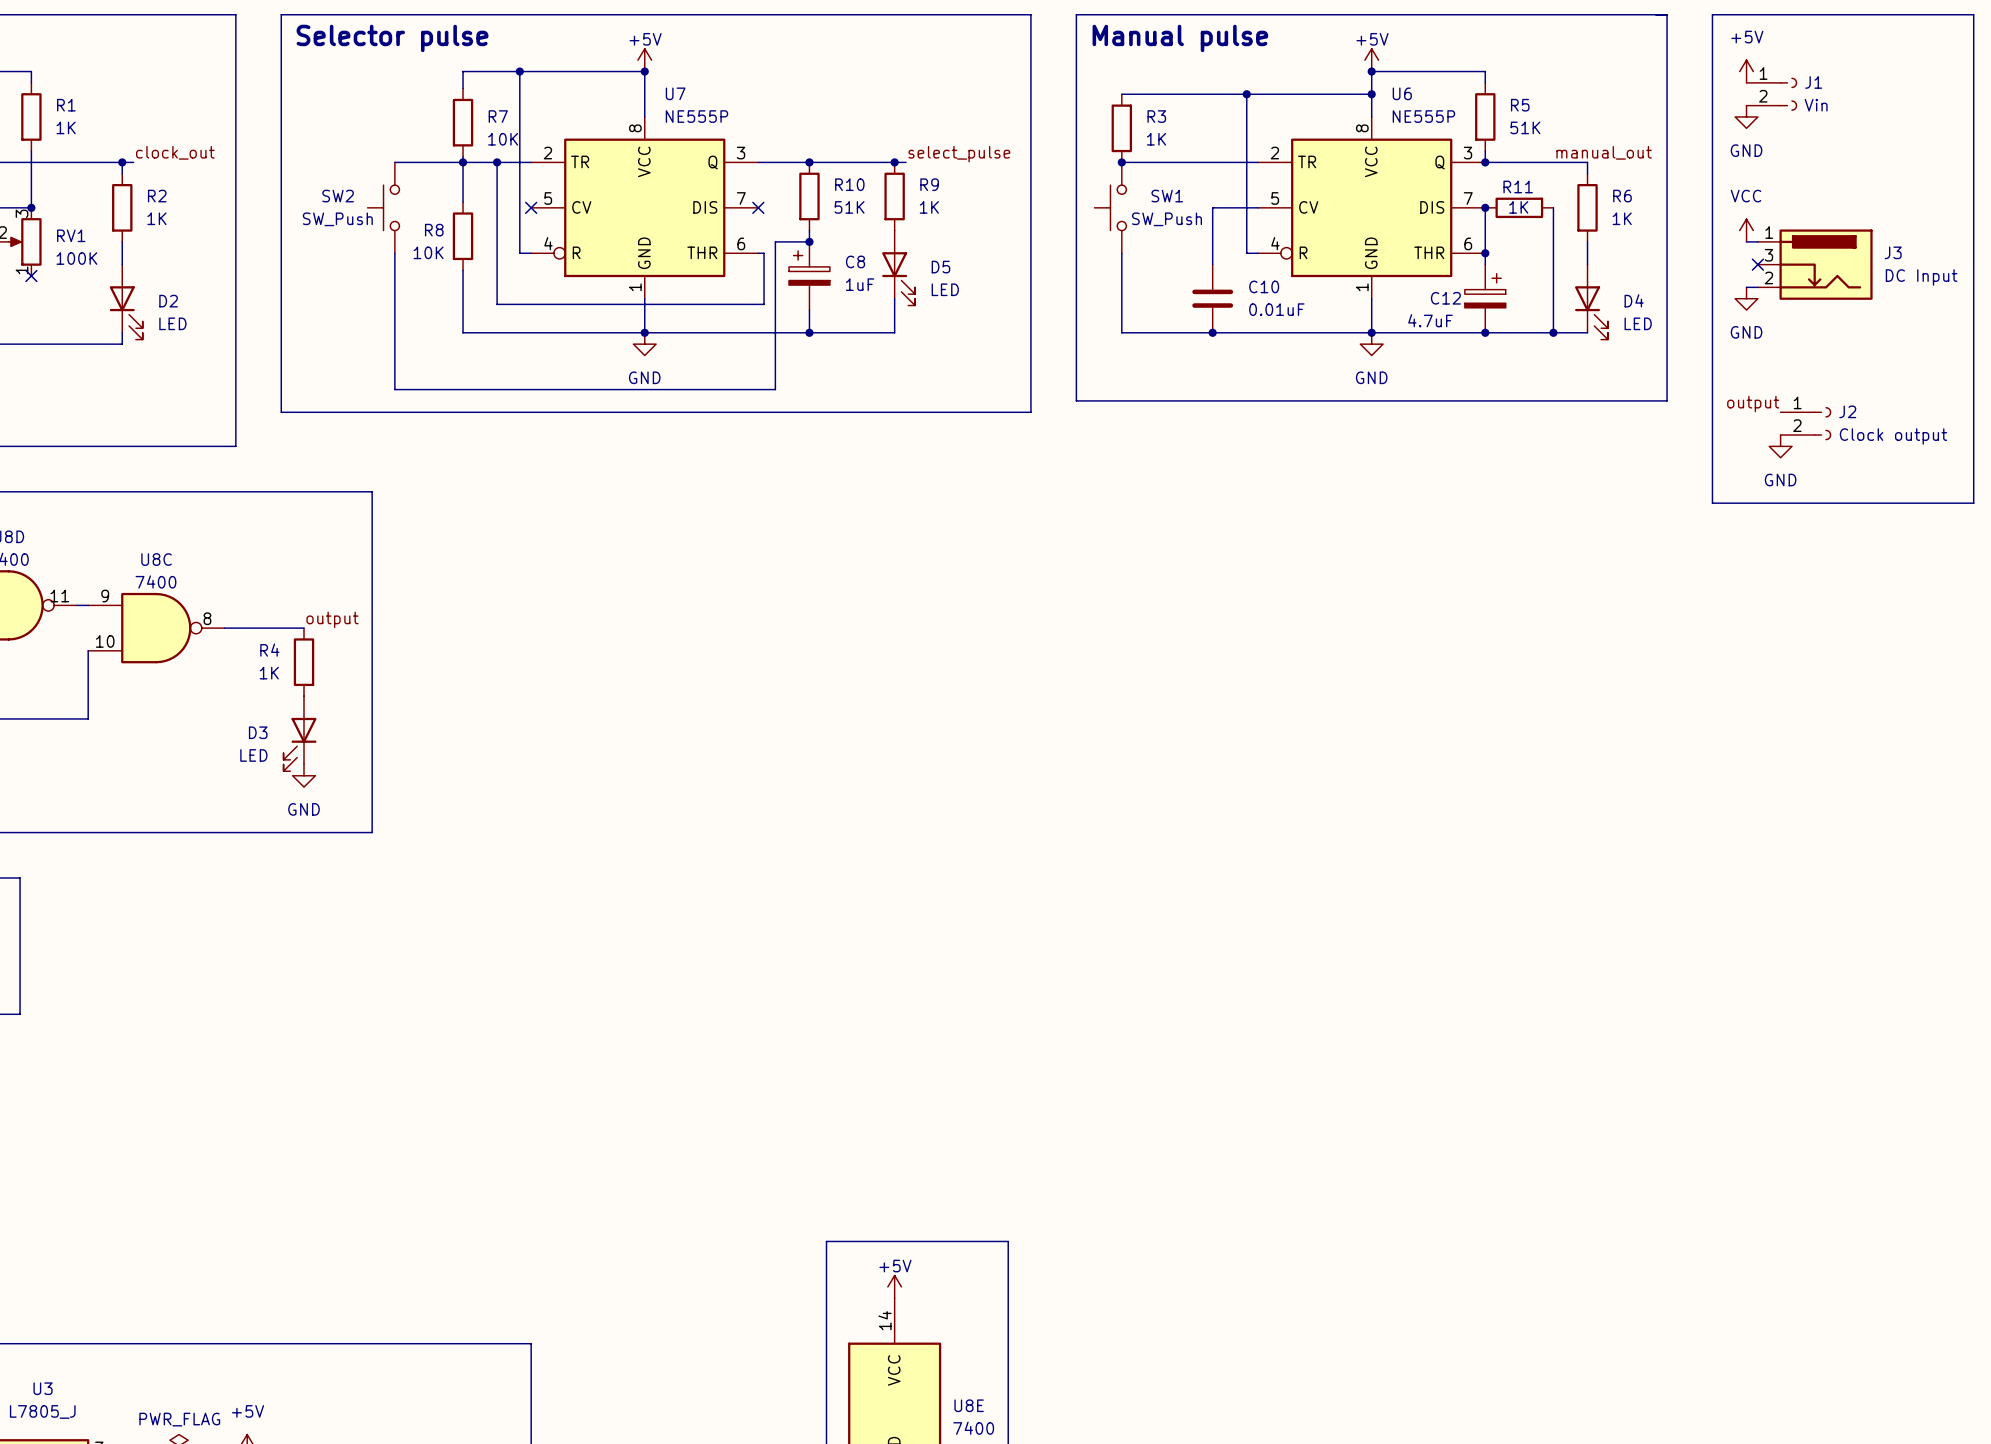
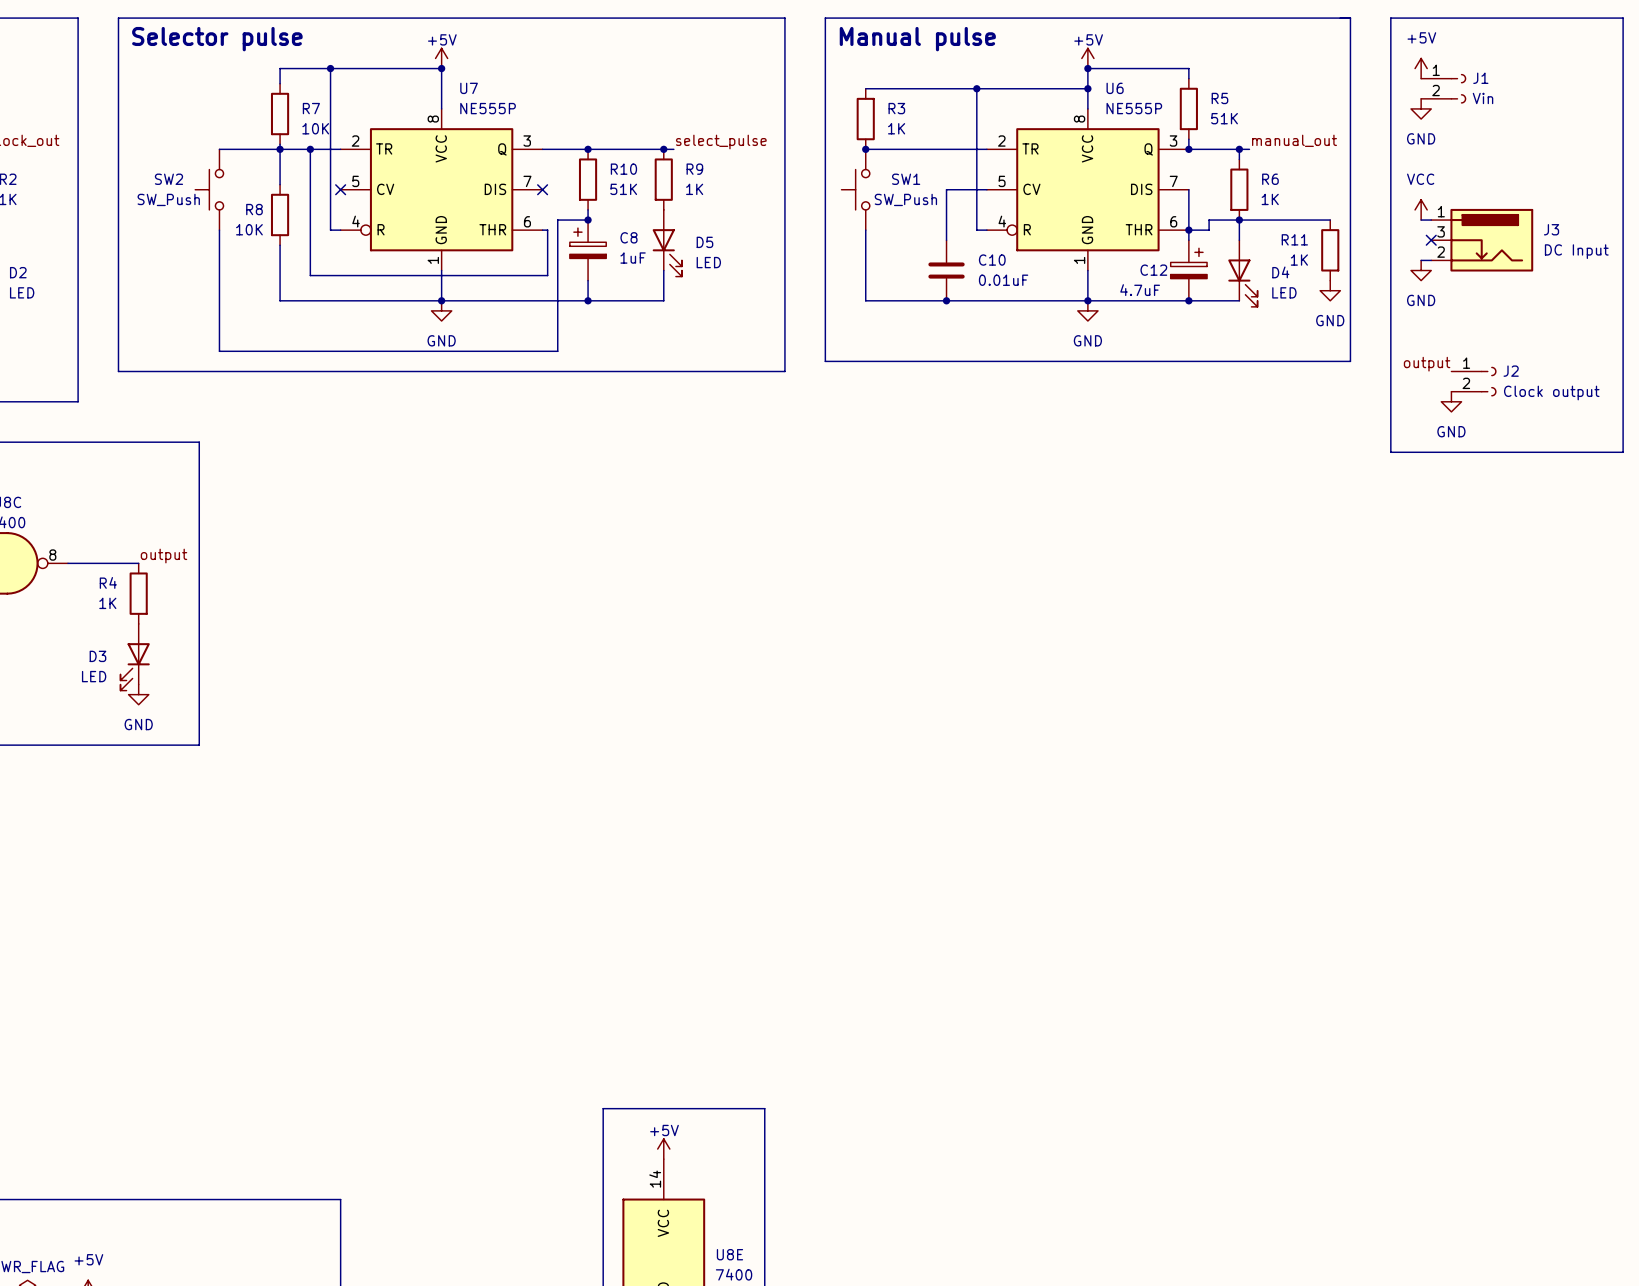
wire: none -> (1239, 149) (1239, 159)
junction: none -> (1239, 149)
wire: (1553, 162) (1587, 162) (1587, 173) -> none
R11 name position: R11 (1518, 186) -> R11 (1294, 239)
junction: (1485, 207) -> none
R11 value position: 1K (1518, 207) -> 1K (1299, 260)
R11 rotation: 0° (1519, 207) -> 90° clockwise (1330, 250)
R11 position: (1519, 207) -> (1330, 250)
wire: (1553, 207) (1553, 332) -> none
R6 position: (1587, 207) -> (1239, 189)
junction: none -> (1239, 220)
wire: (1587, 241) (1587, 264) -> (1239, 220) (1239, 240)
wire: none -> (1330, 220) (1209, 220) (1209, 230) (1188, 230)
D4 position: (1591, 302) -> (1242, 273)
power symbol: none -> GND (1330, 290)
wire: (1542, 332) (1587, 332) -> none
junction: (1553, 332) -> none

